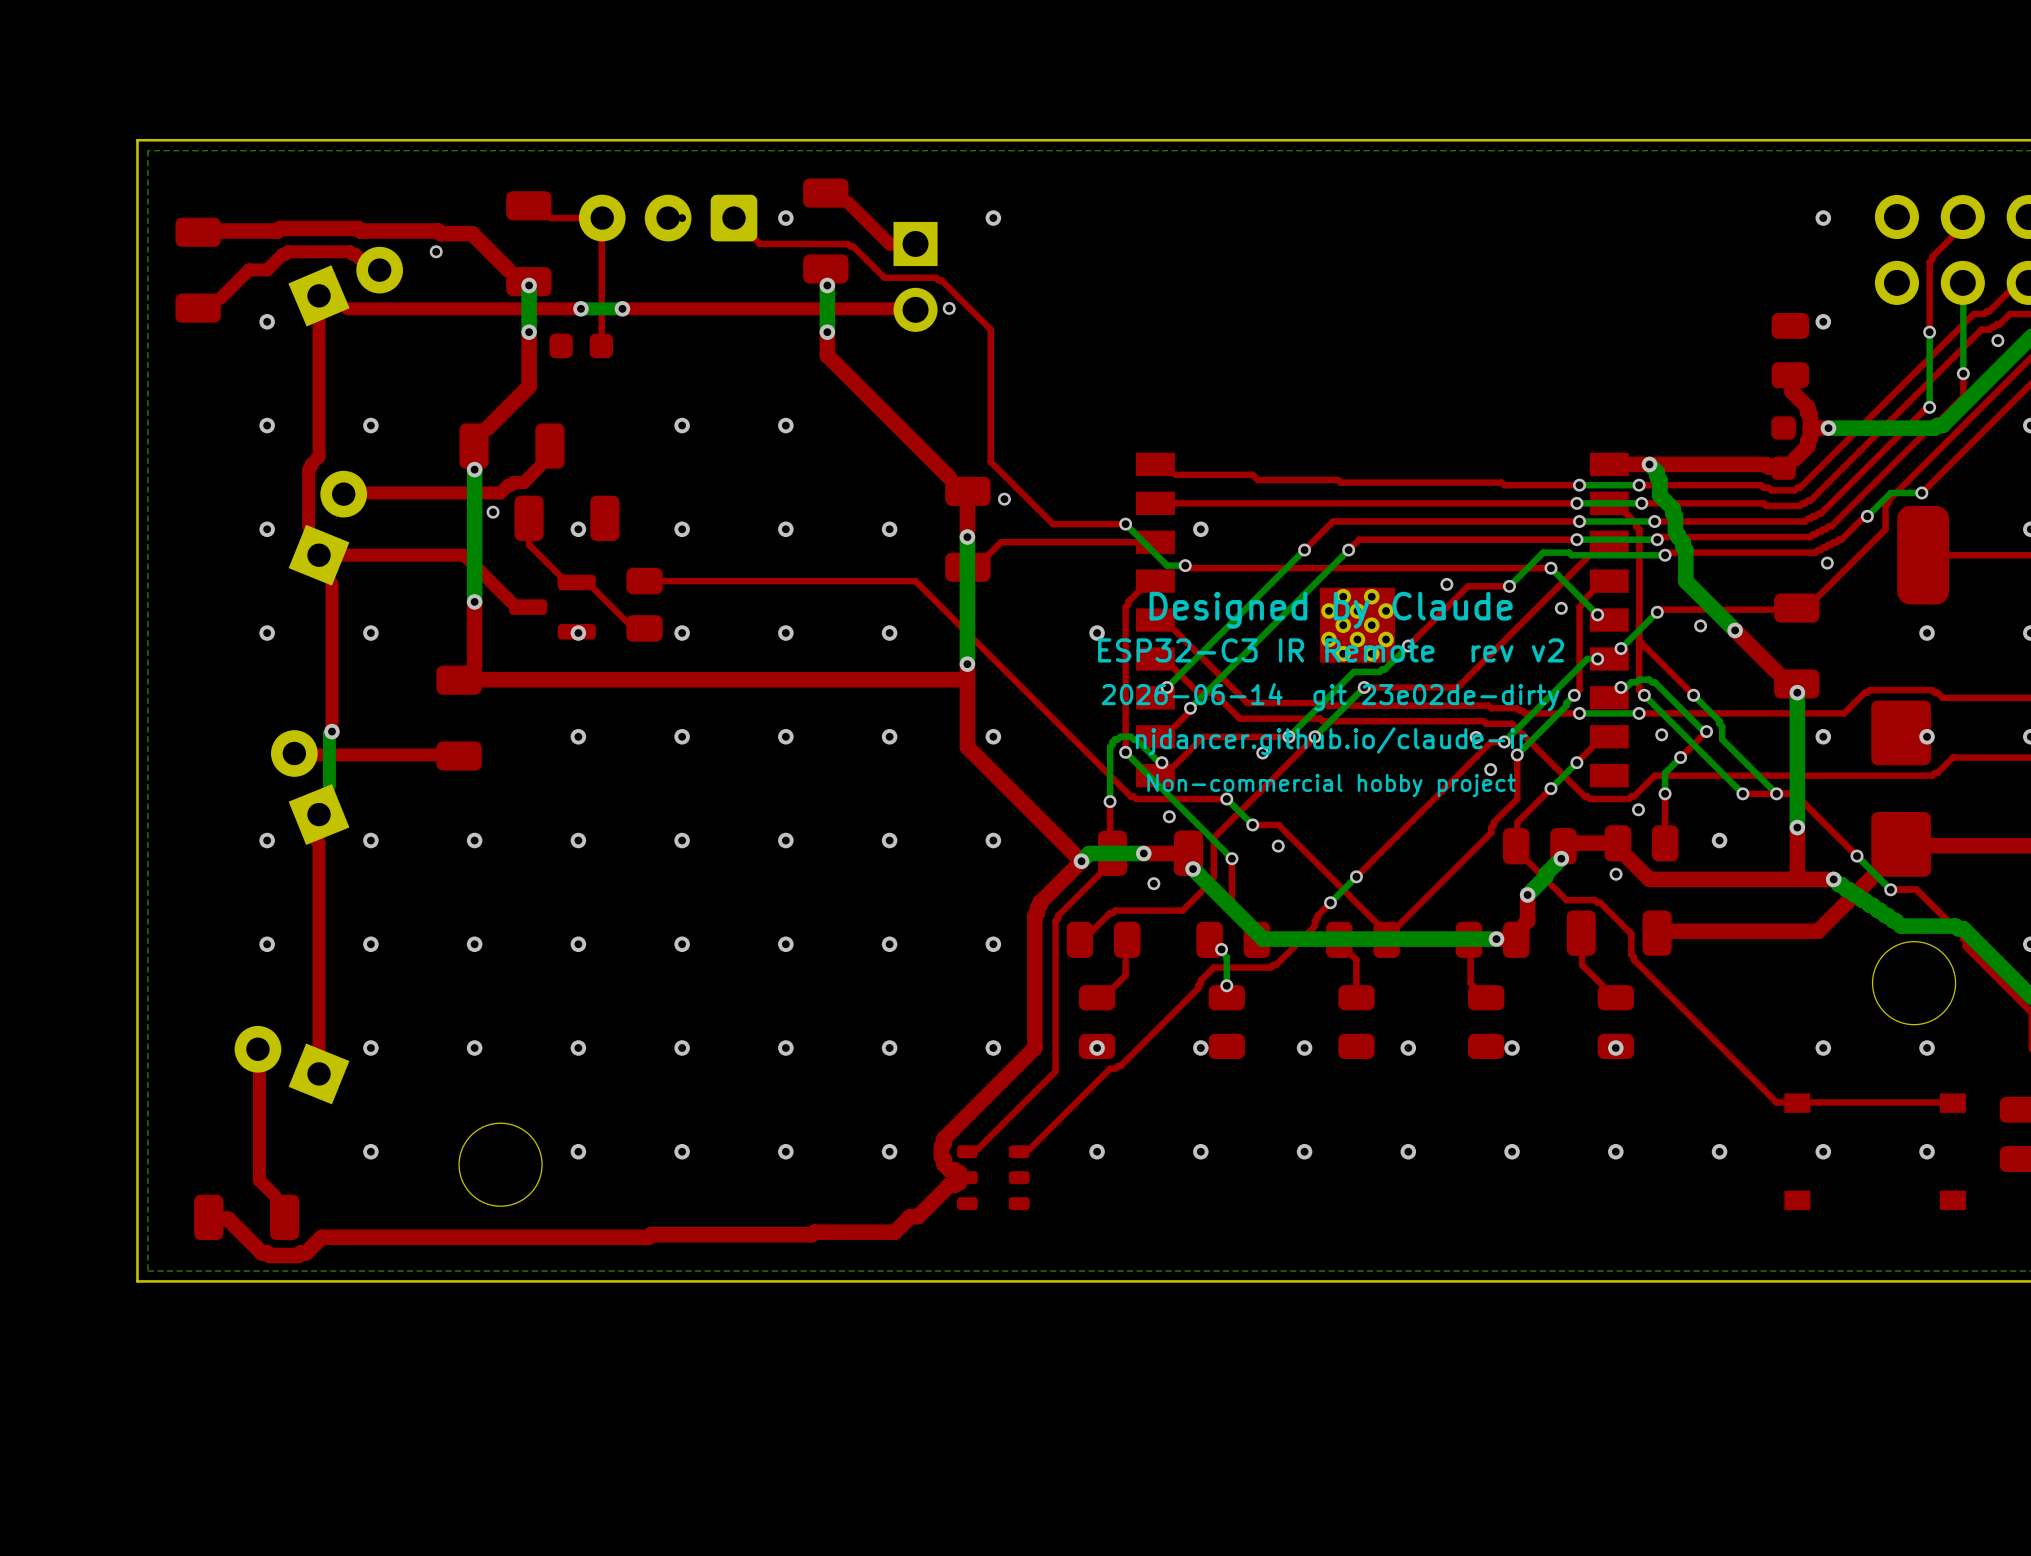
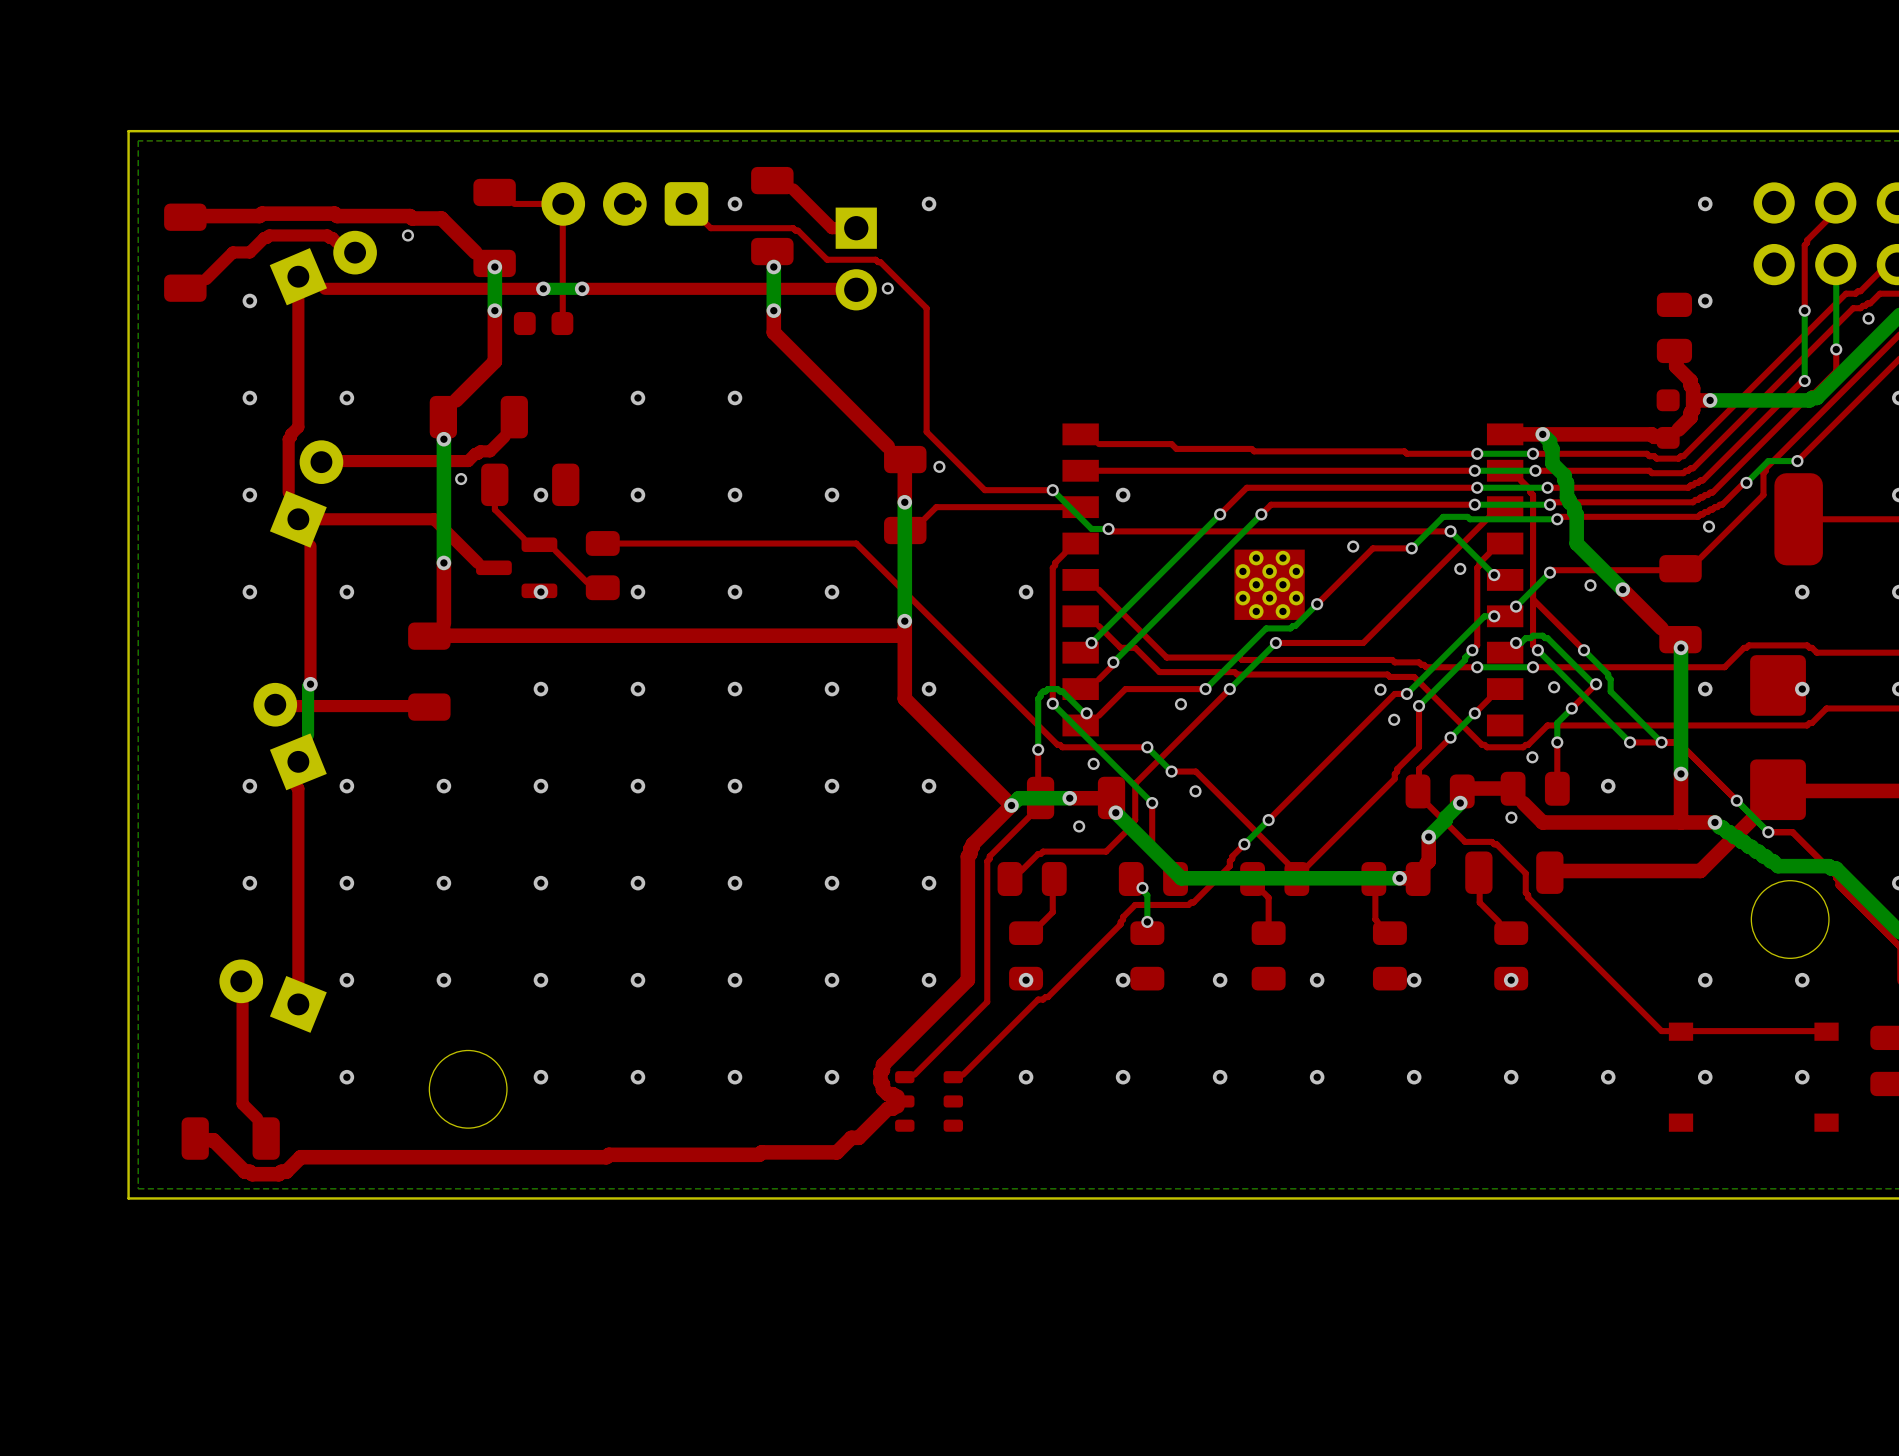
text: Designed by Claude (1331, 610) -> none
text: ESP32-C3 IR Remote rev v2 (1331, 650) -> none
text: 2026-06-14 git 23e02de-dirty (1330, 697) -> none
text: njdancer.github.io/claude-ir (1331, 741) -> none
text: Non-commercial hobby project (1331, 785) -> none

